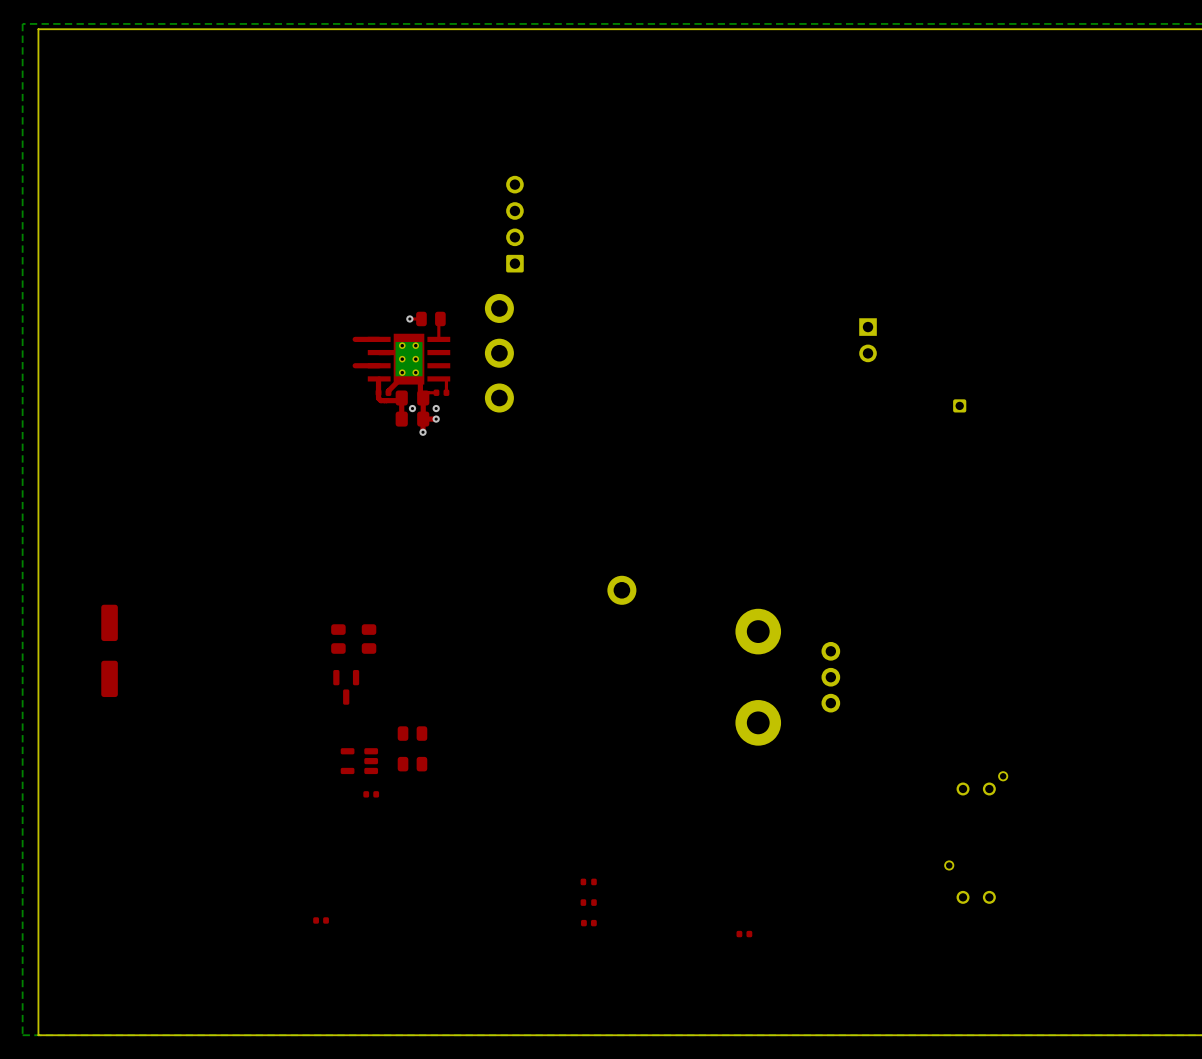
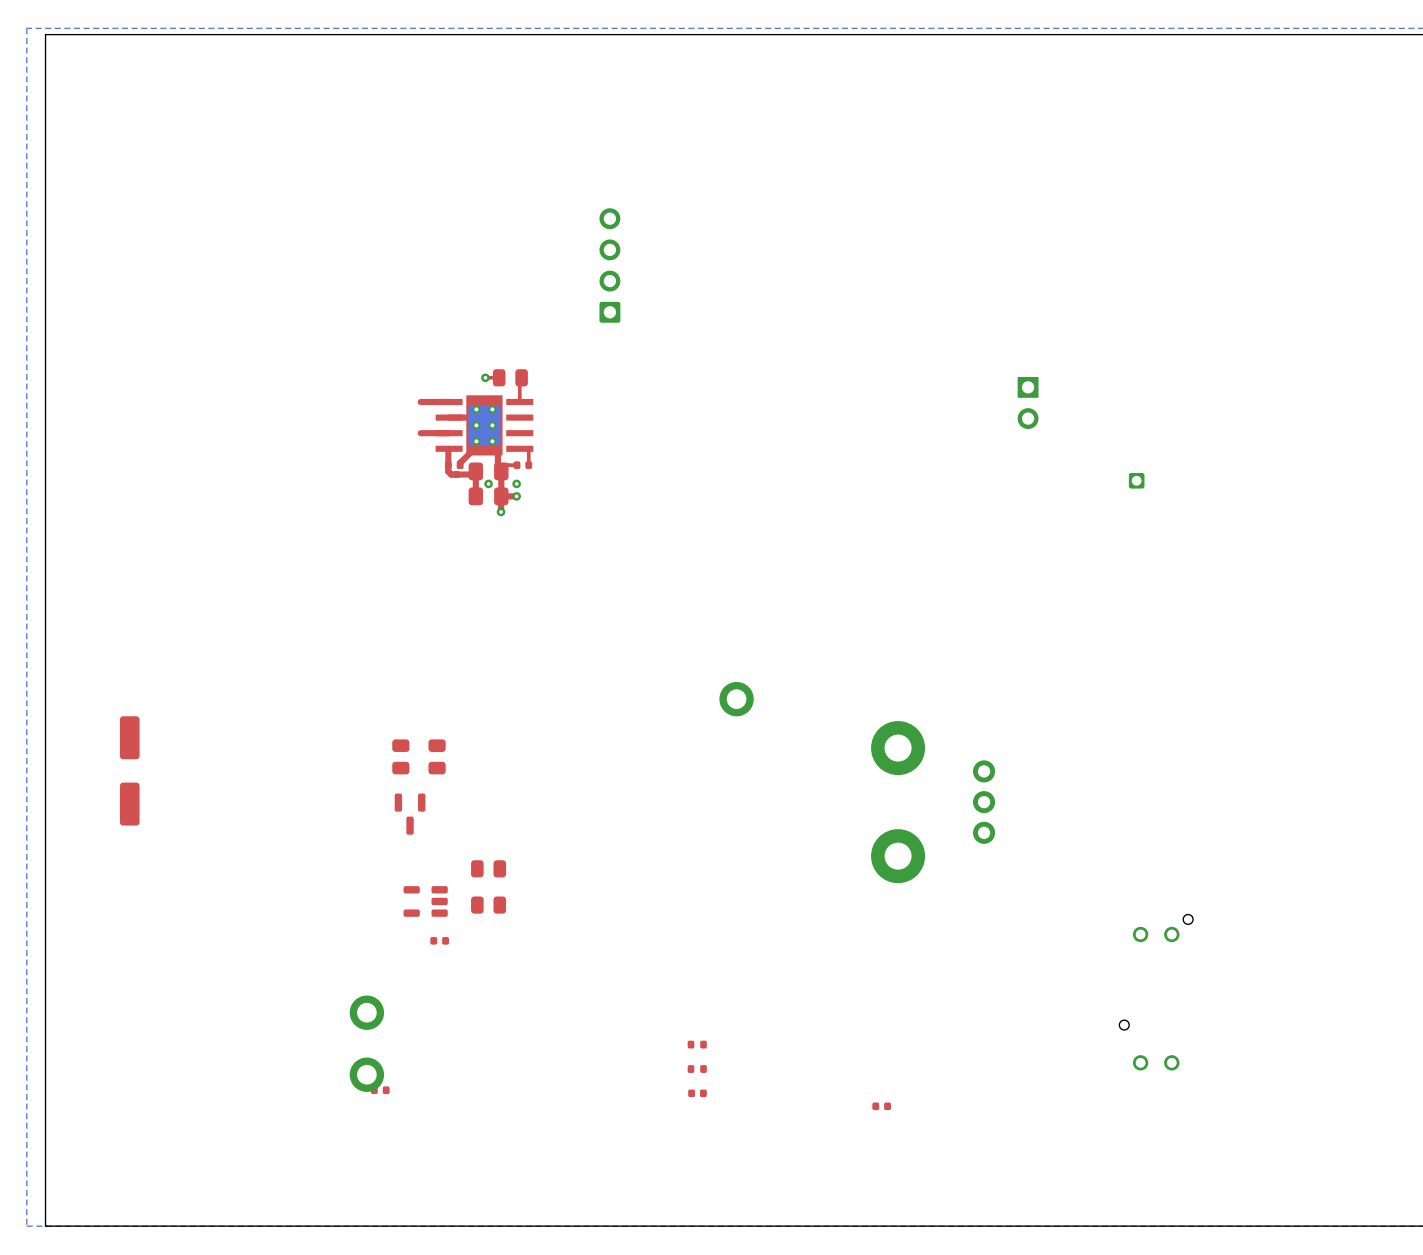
part: (499, 308) -> none
part: (499, 353) -> none
part: (499, 398) -> none
part: none -> (366, 1012)
part: none -> (366, 1074)

